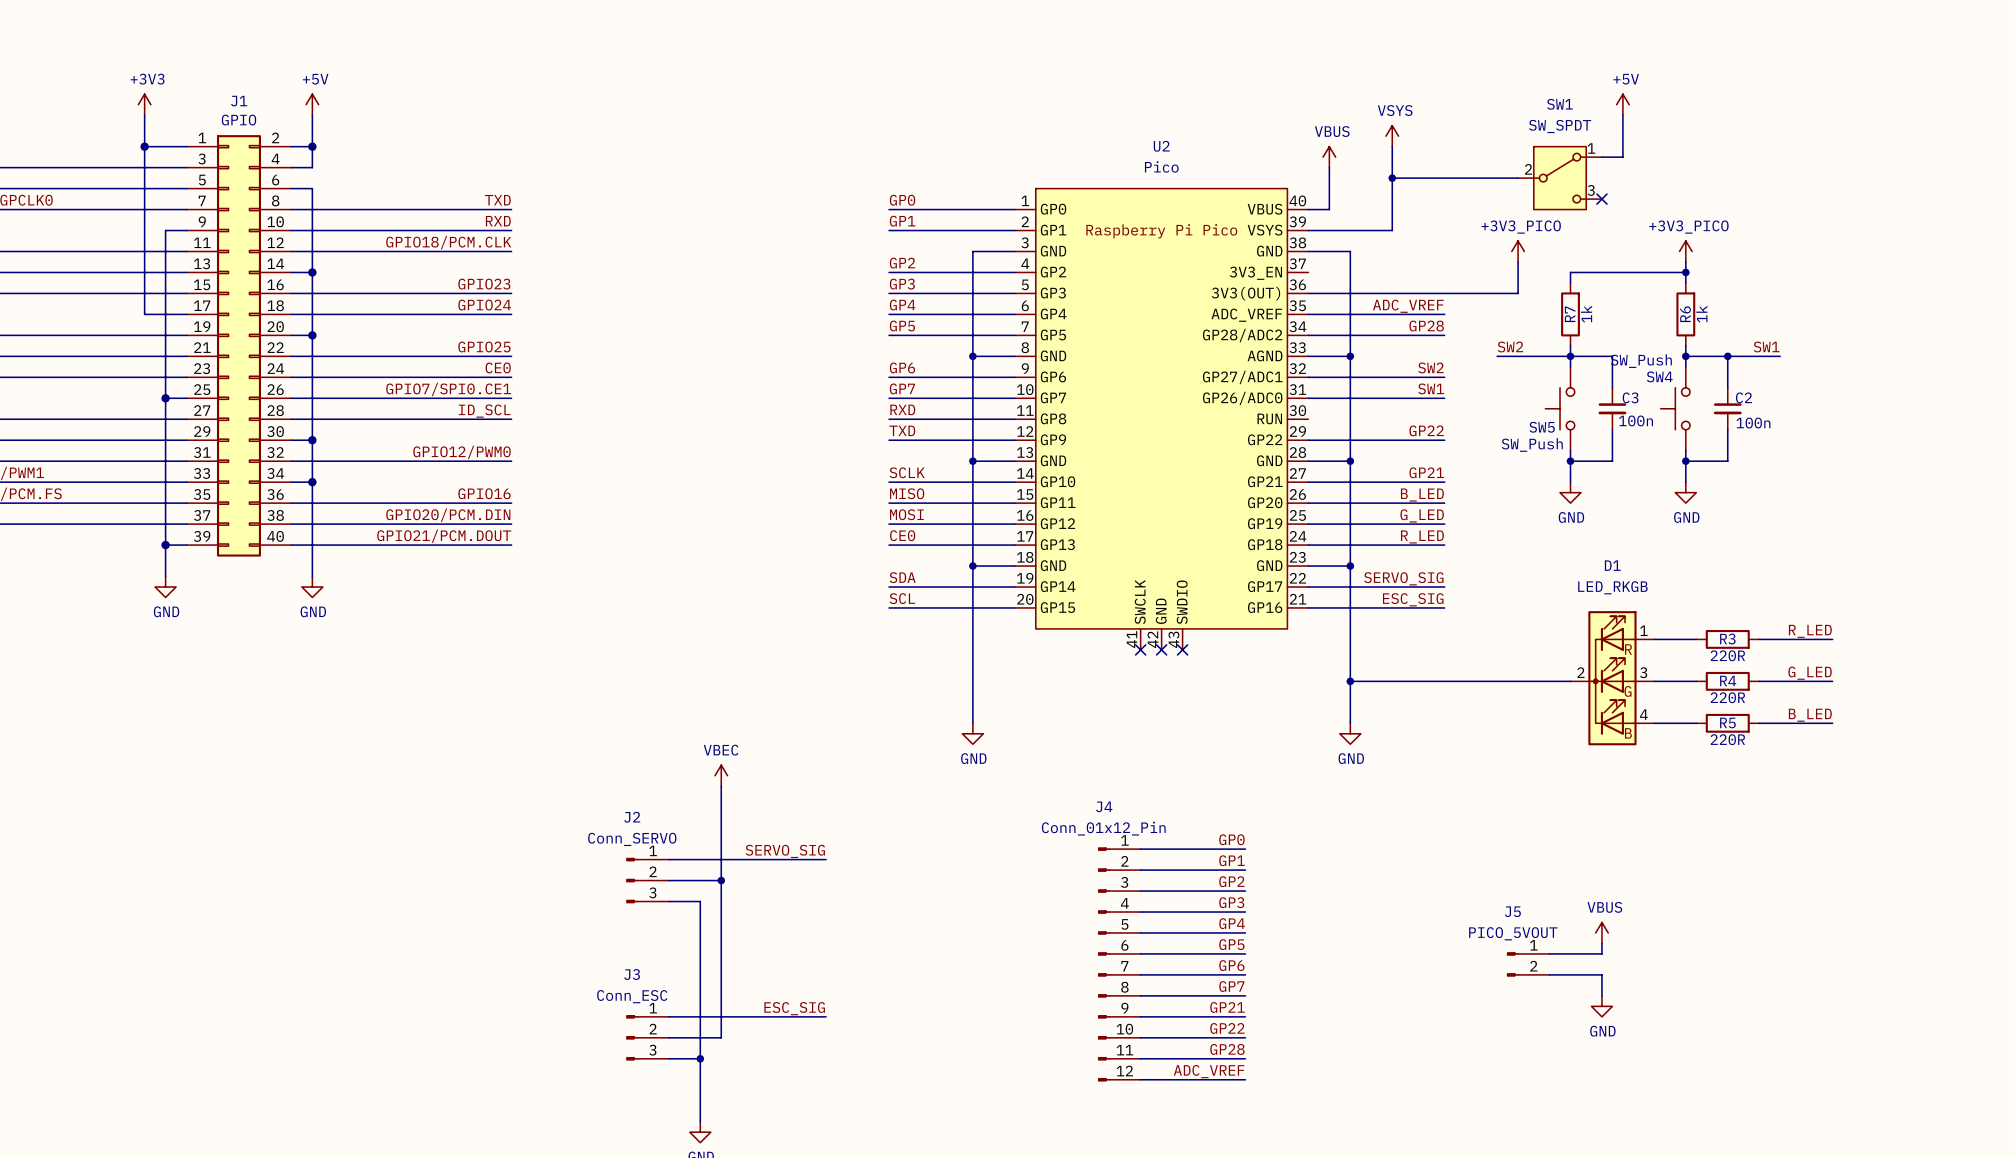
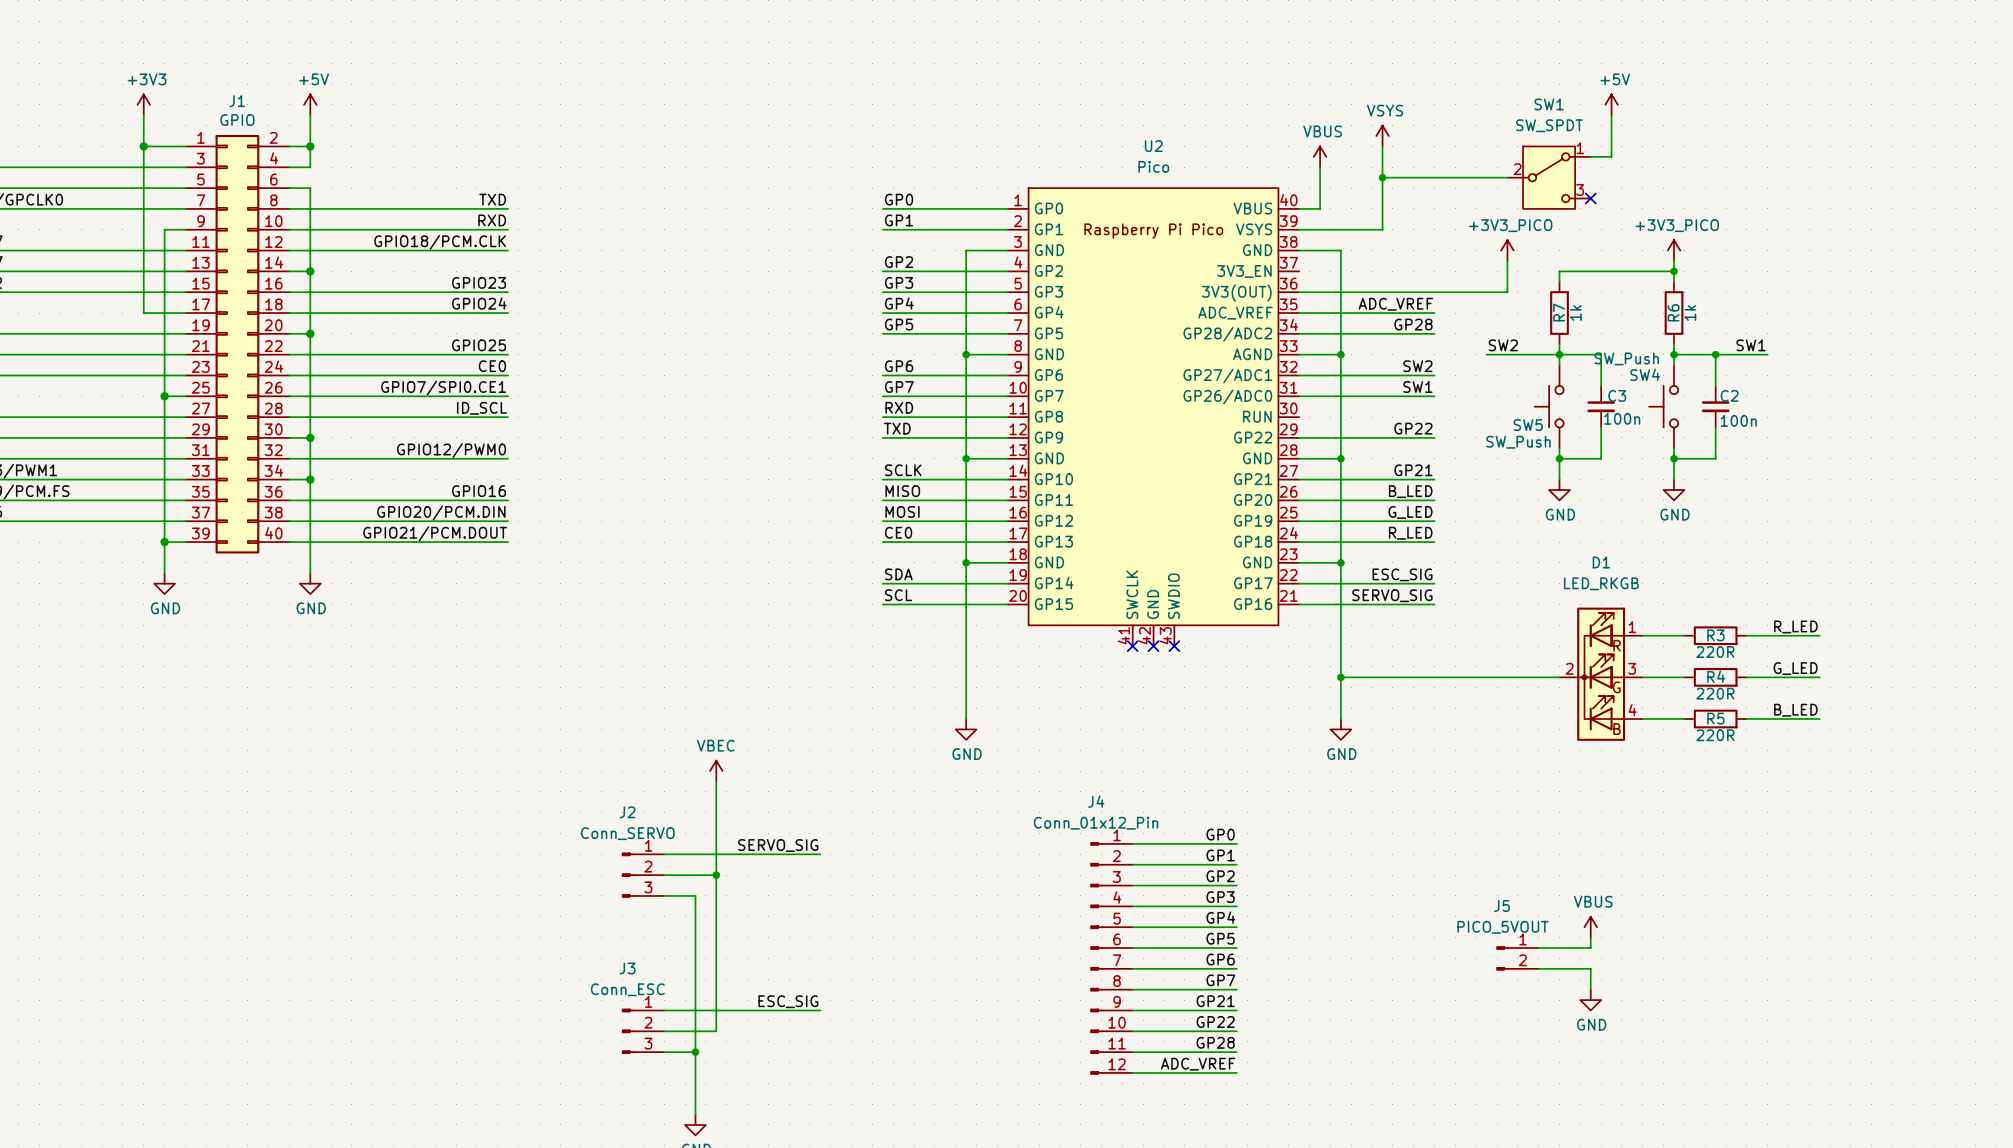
label: SERVO_SIG (1403, 578) -> ESC_SIG (1402, 574)
label: ESC_SIG (1413, 599) -> SERVO_SIG (1392, 595)

